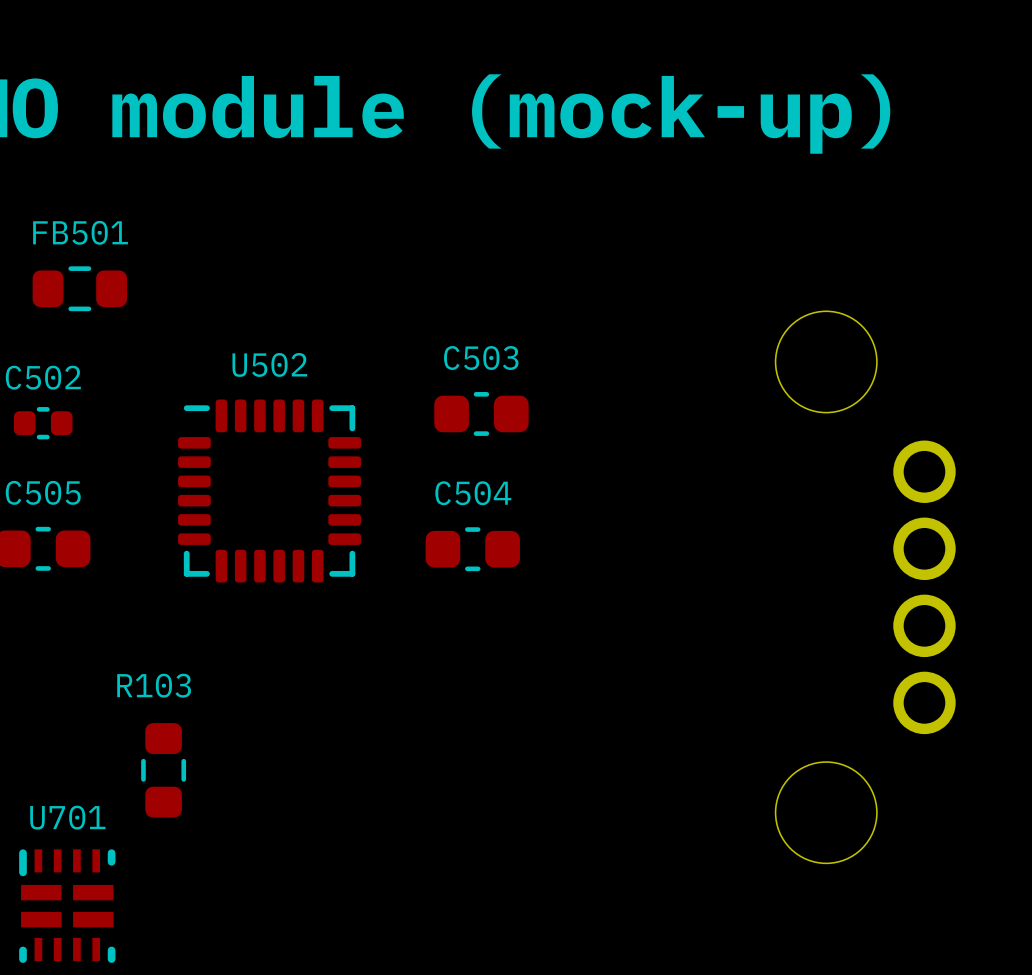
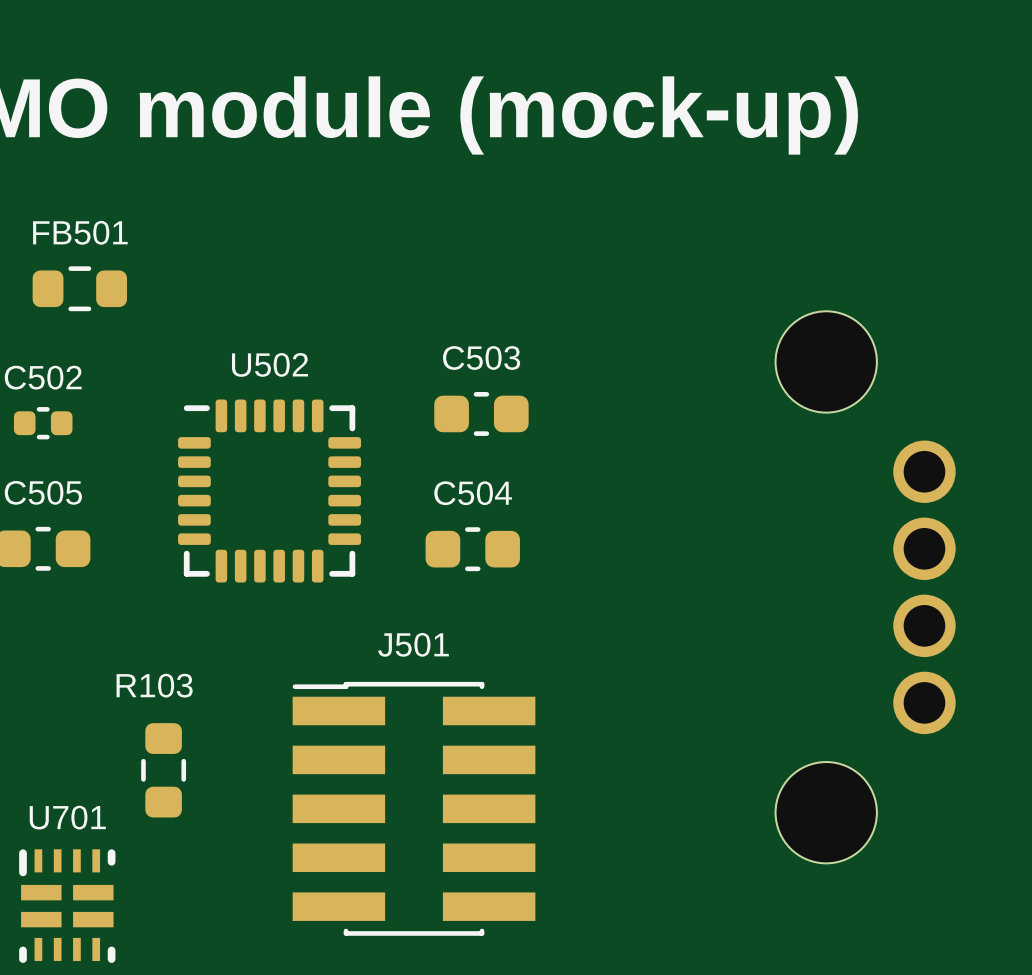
J501: none -> (414, 808)

